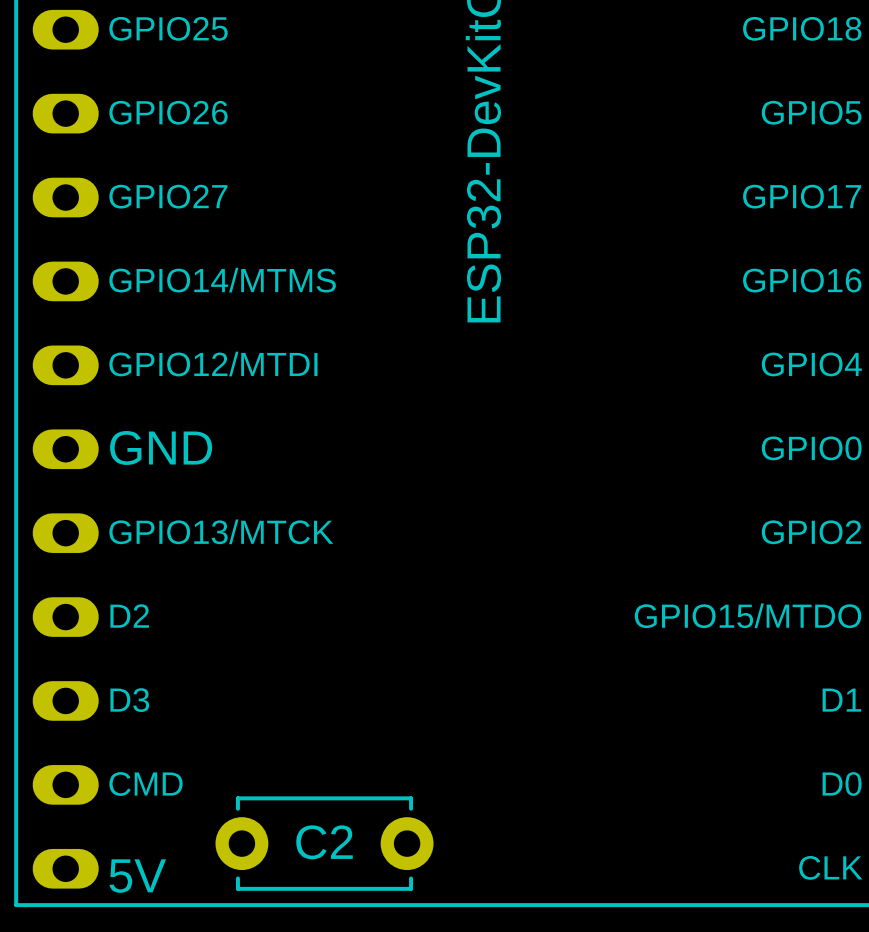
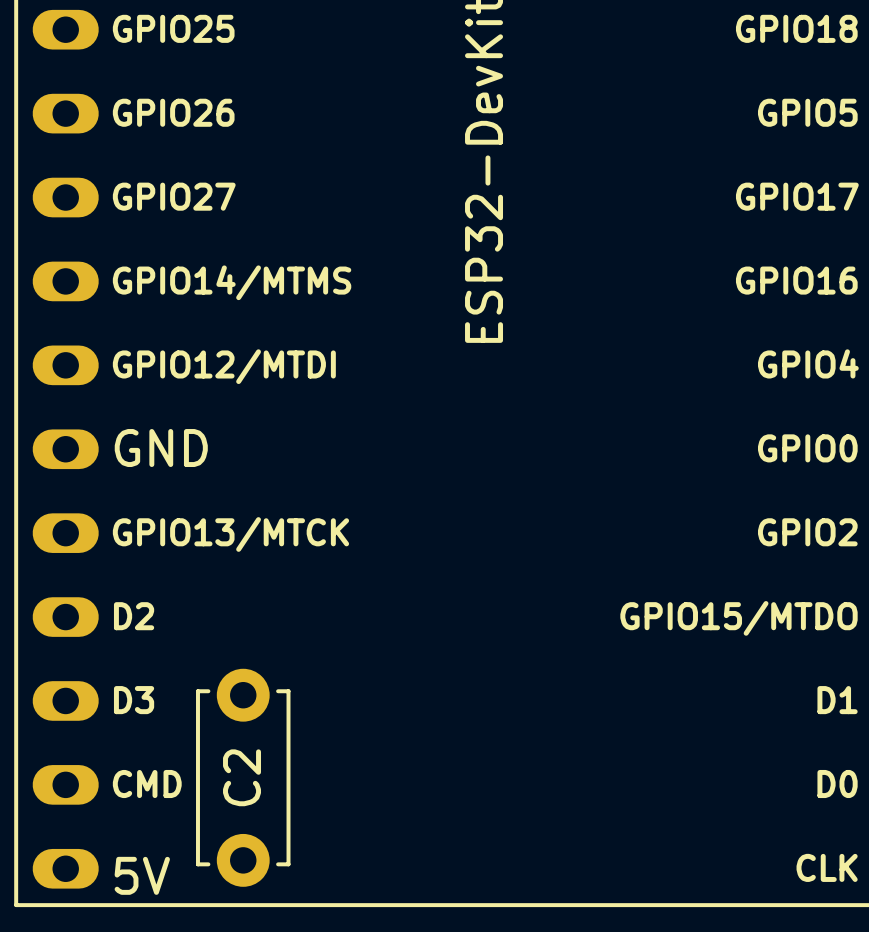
C2 rotation: 0° (324, 843) -> 90° clockwise (243, 777)

